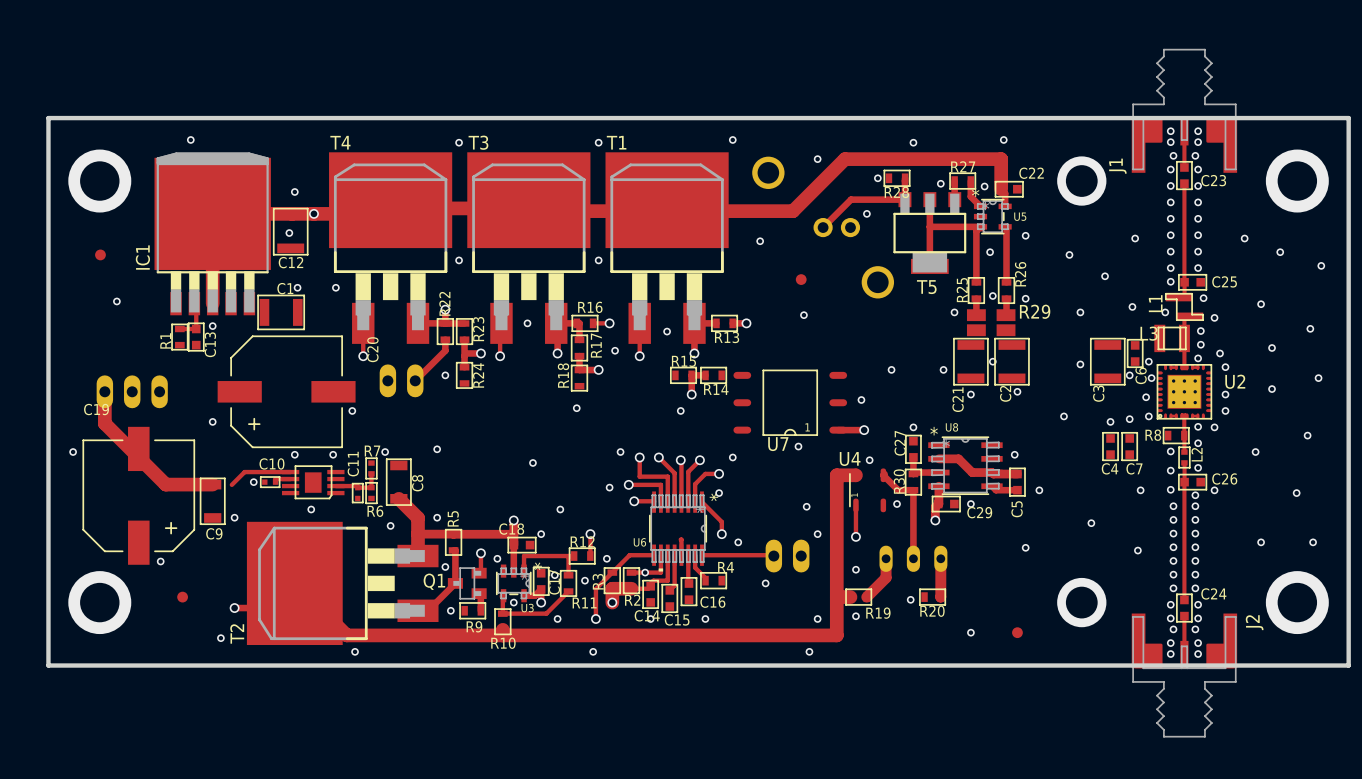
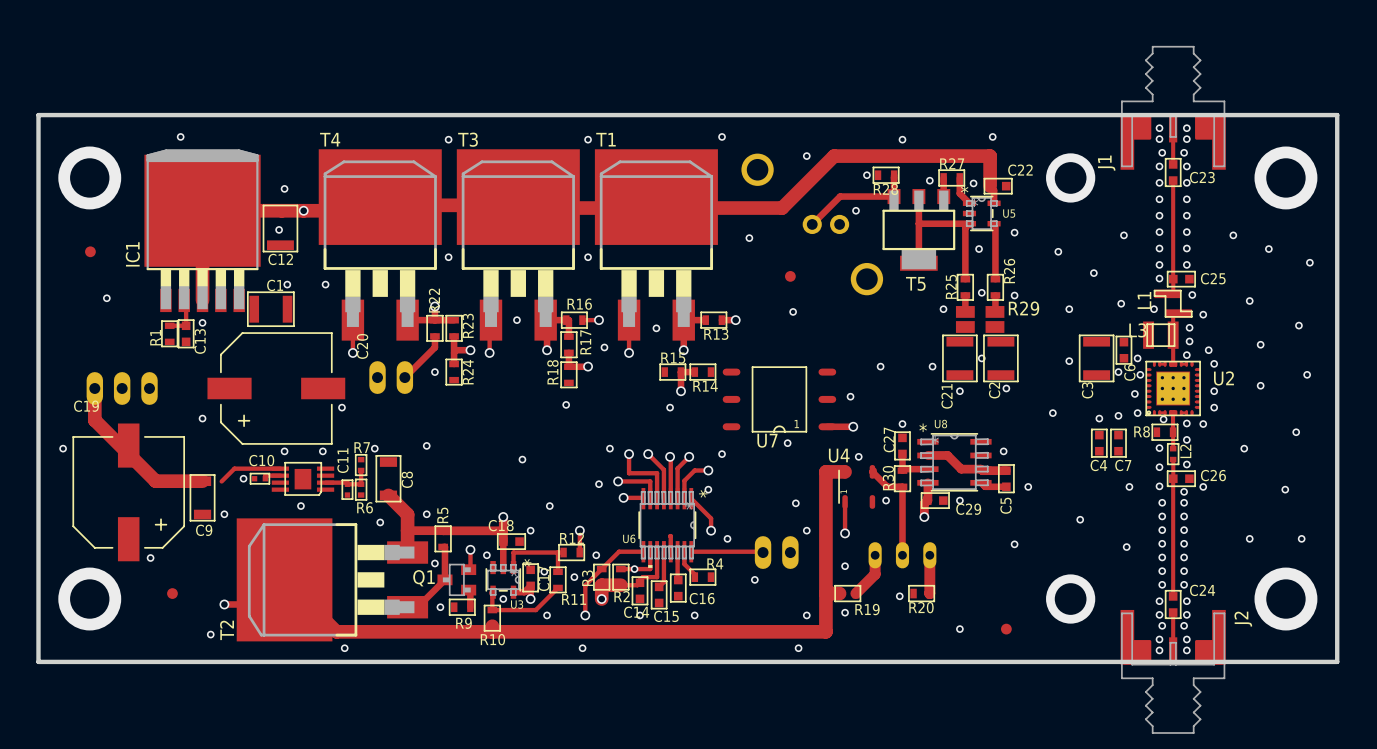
via: none -> (1163, 419)

